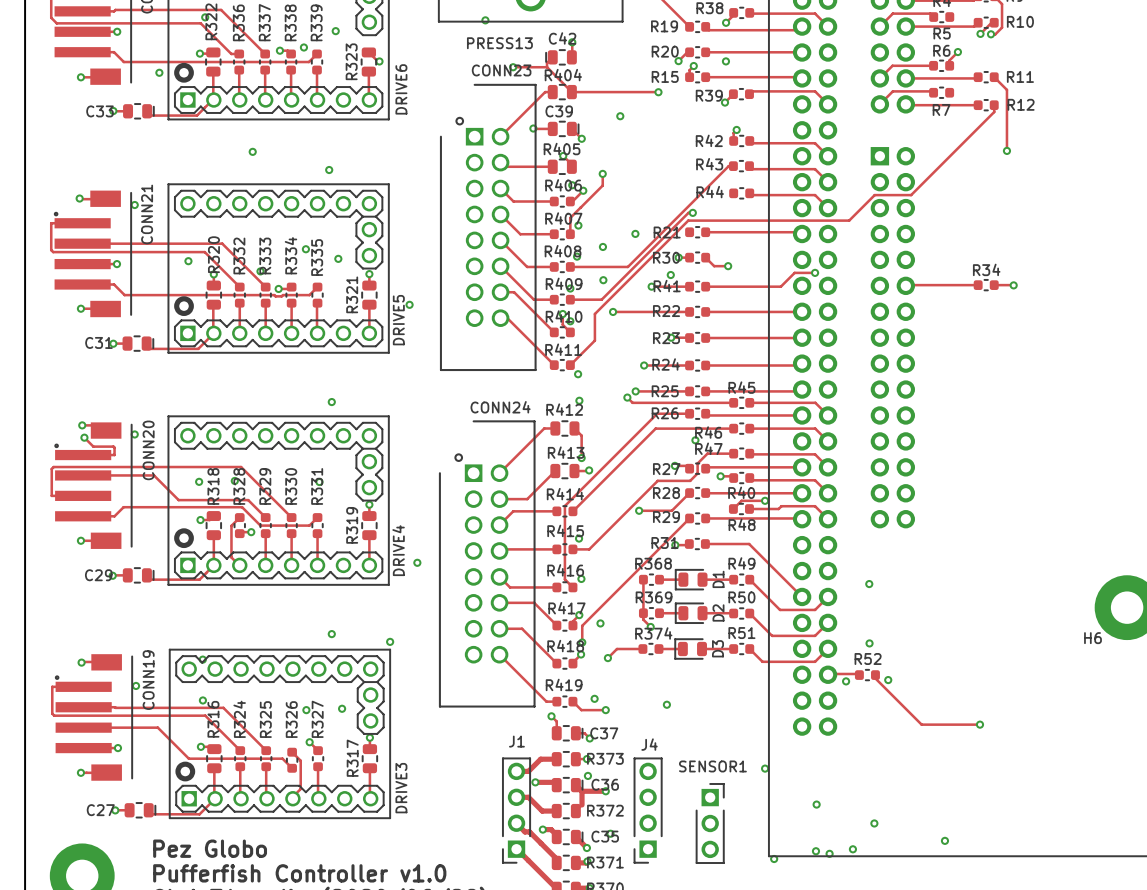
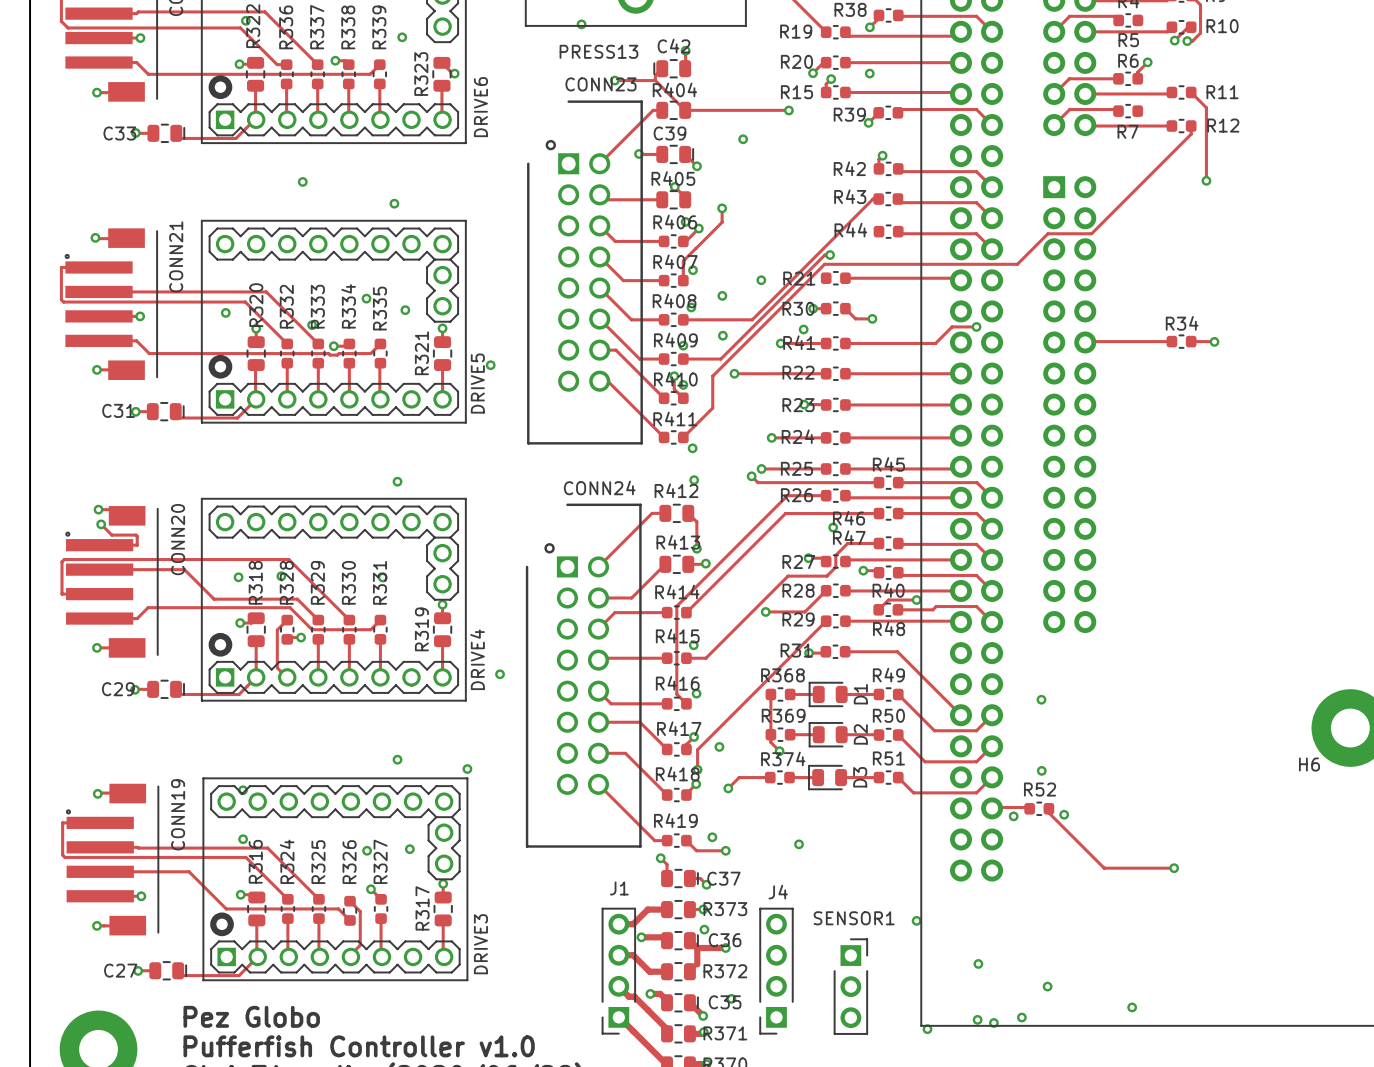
via: (303, 47) -> none
via: (159, 72) -> none
via: (134, 205) -> none
via: (134, 434) -> none
via: (136, 685) -> none

